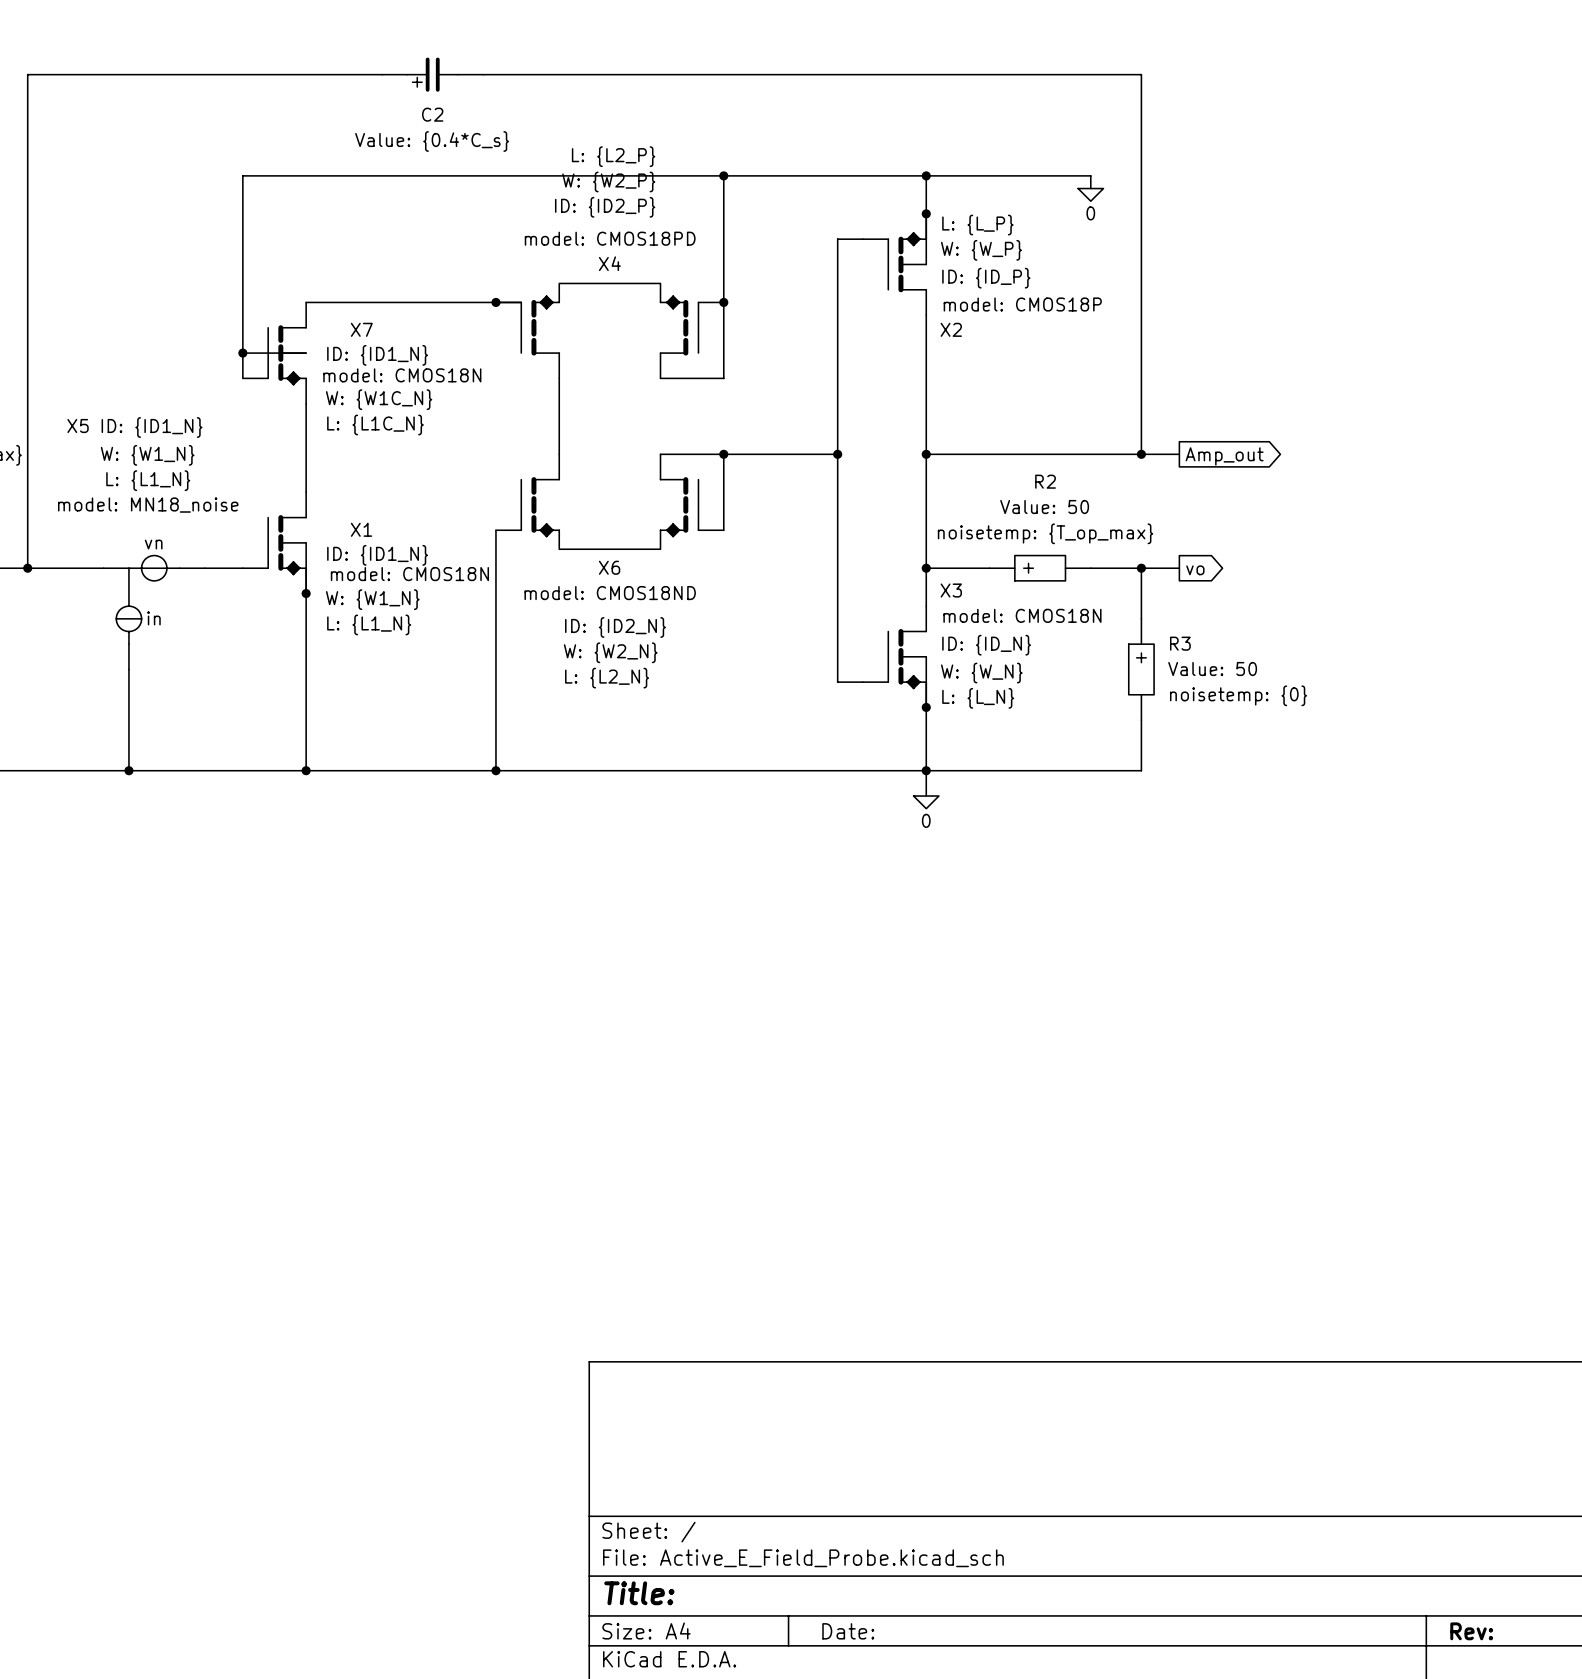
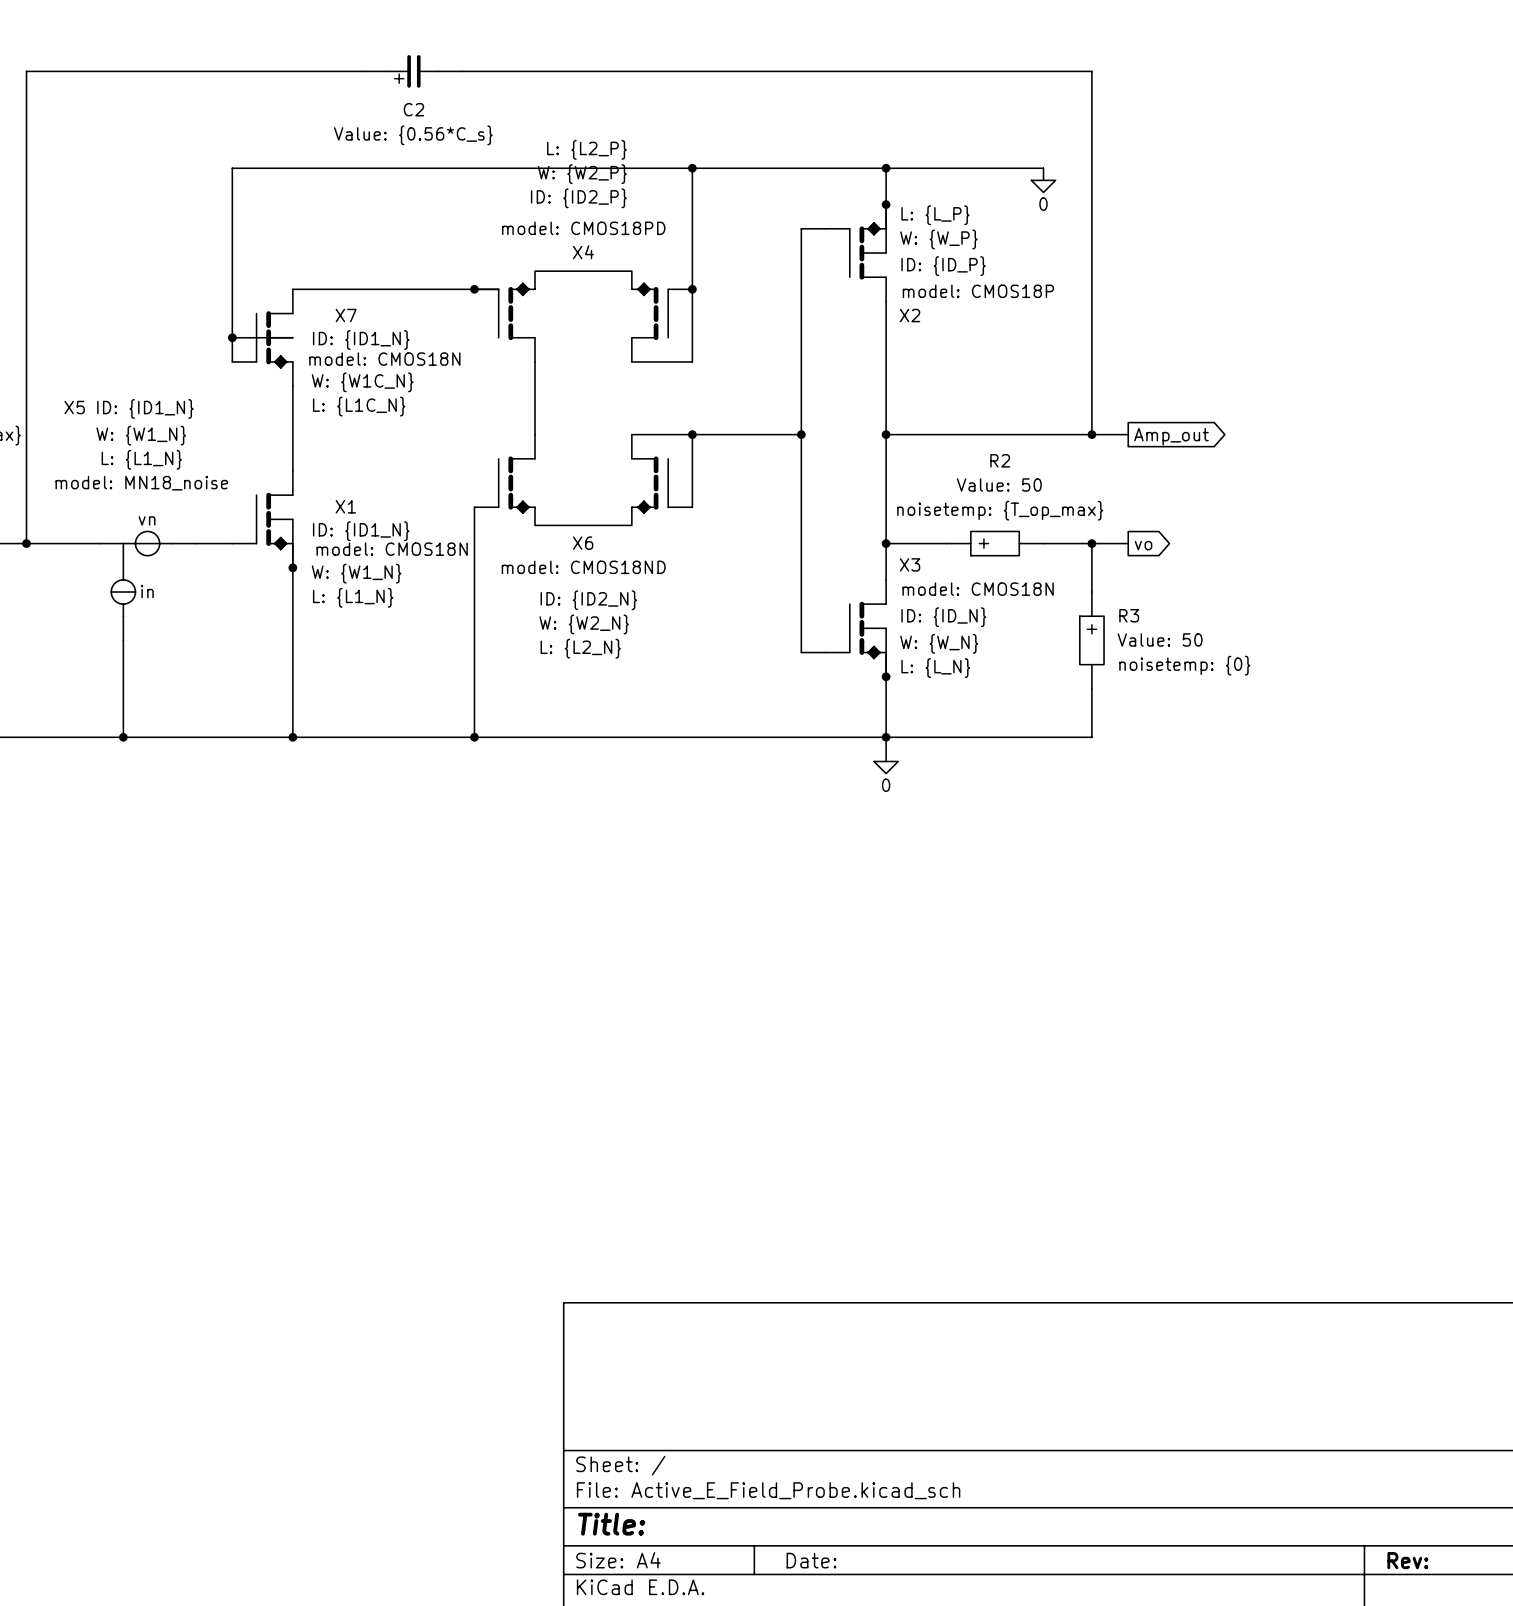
C2 value: Value: {0.4*C_s} (432, 141) -> Value: {0.56*C_s} (413, 135)

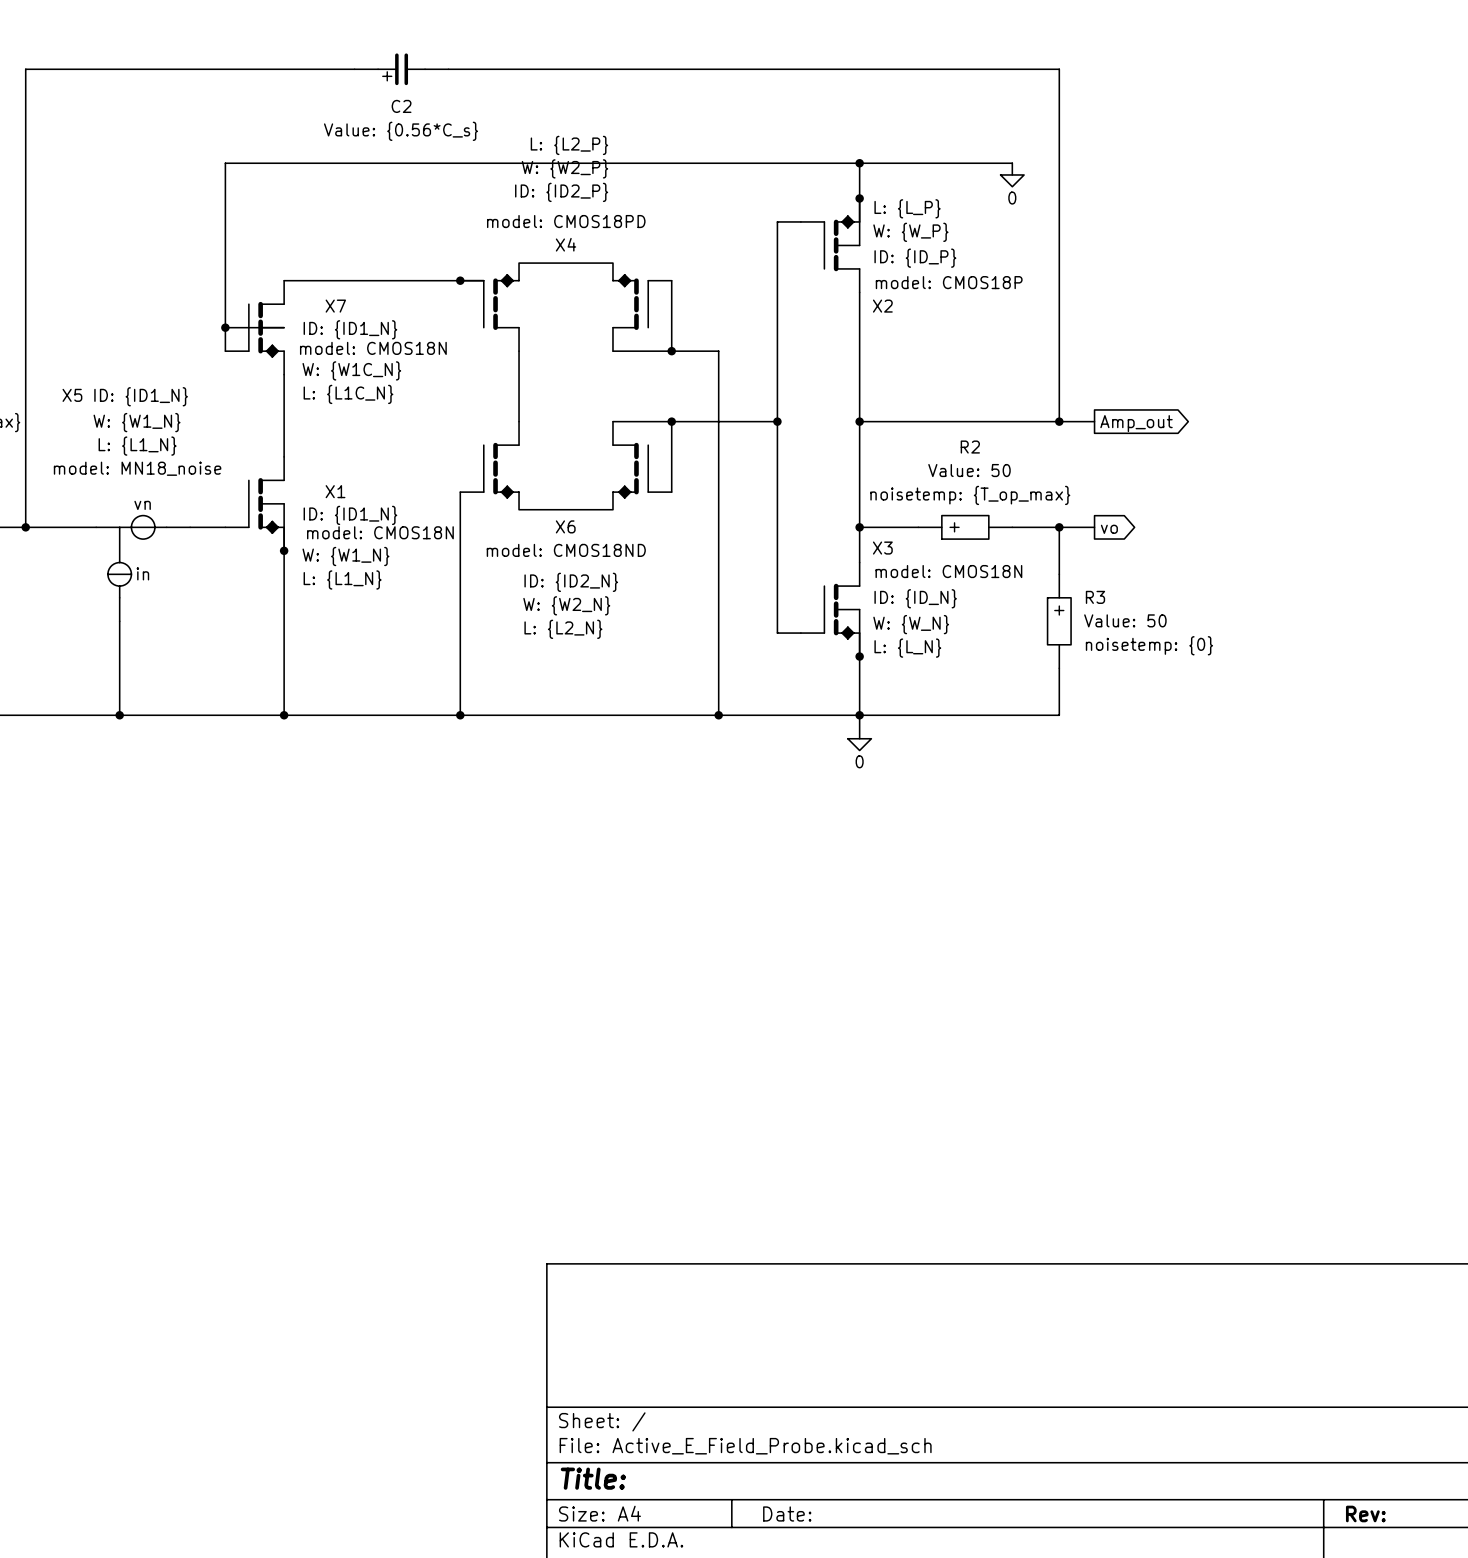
wire: (692, 168) (692, 289) -> none
junction: (692, 168) -> none
junction: (692, 289) -> none
wire: none -> (671, 351) (718, 351) (718, 715)
junction: none -> (671, 351)
junction: none -> (718, 715)

